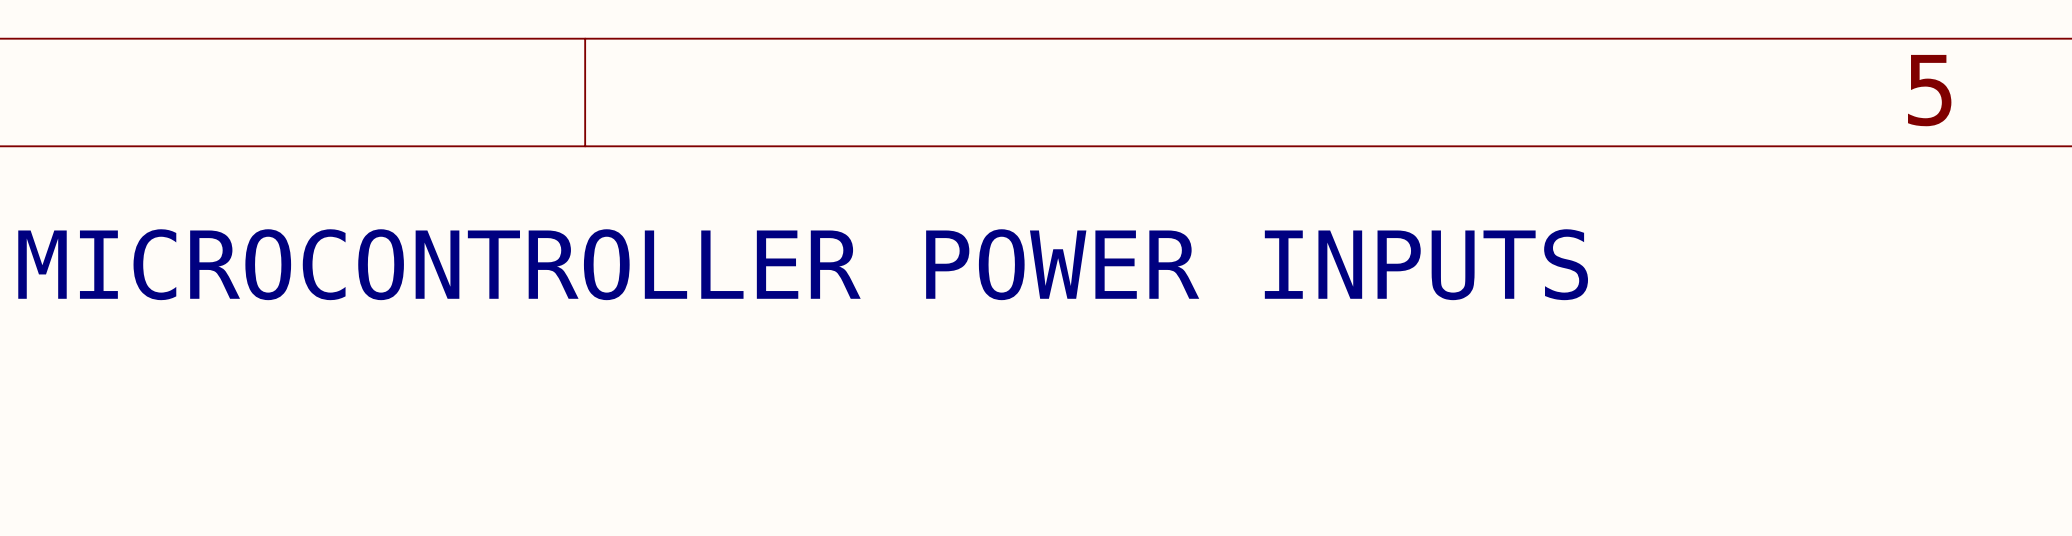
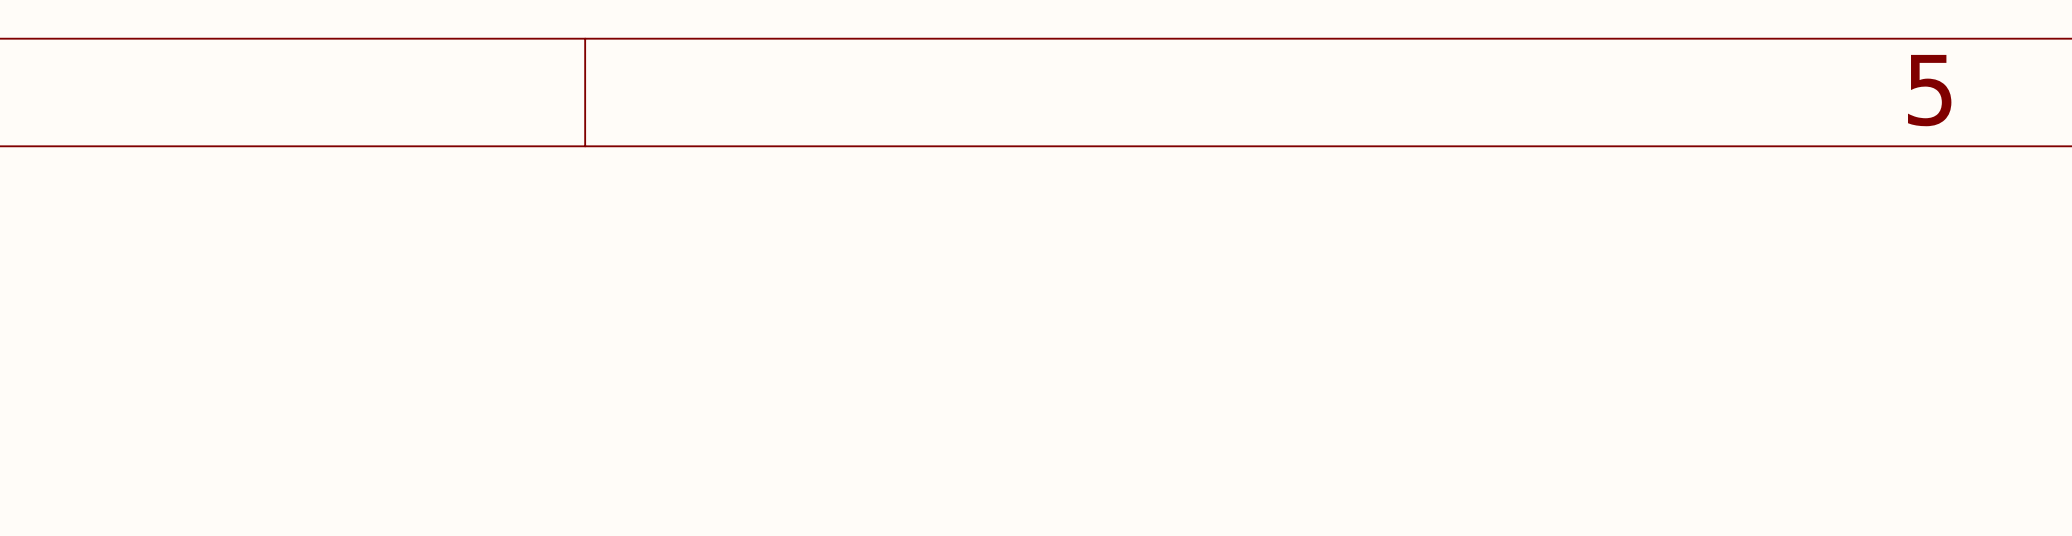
text: MICROCONTROLLER POWER INPUTS (803, 264) -> none

